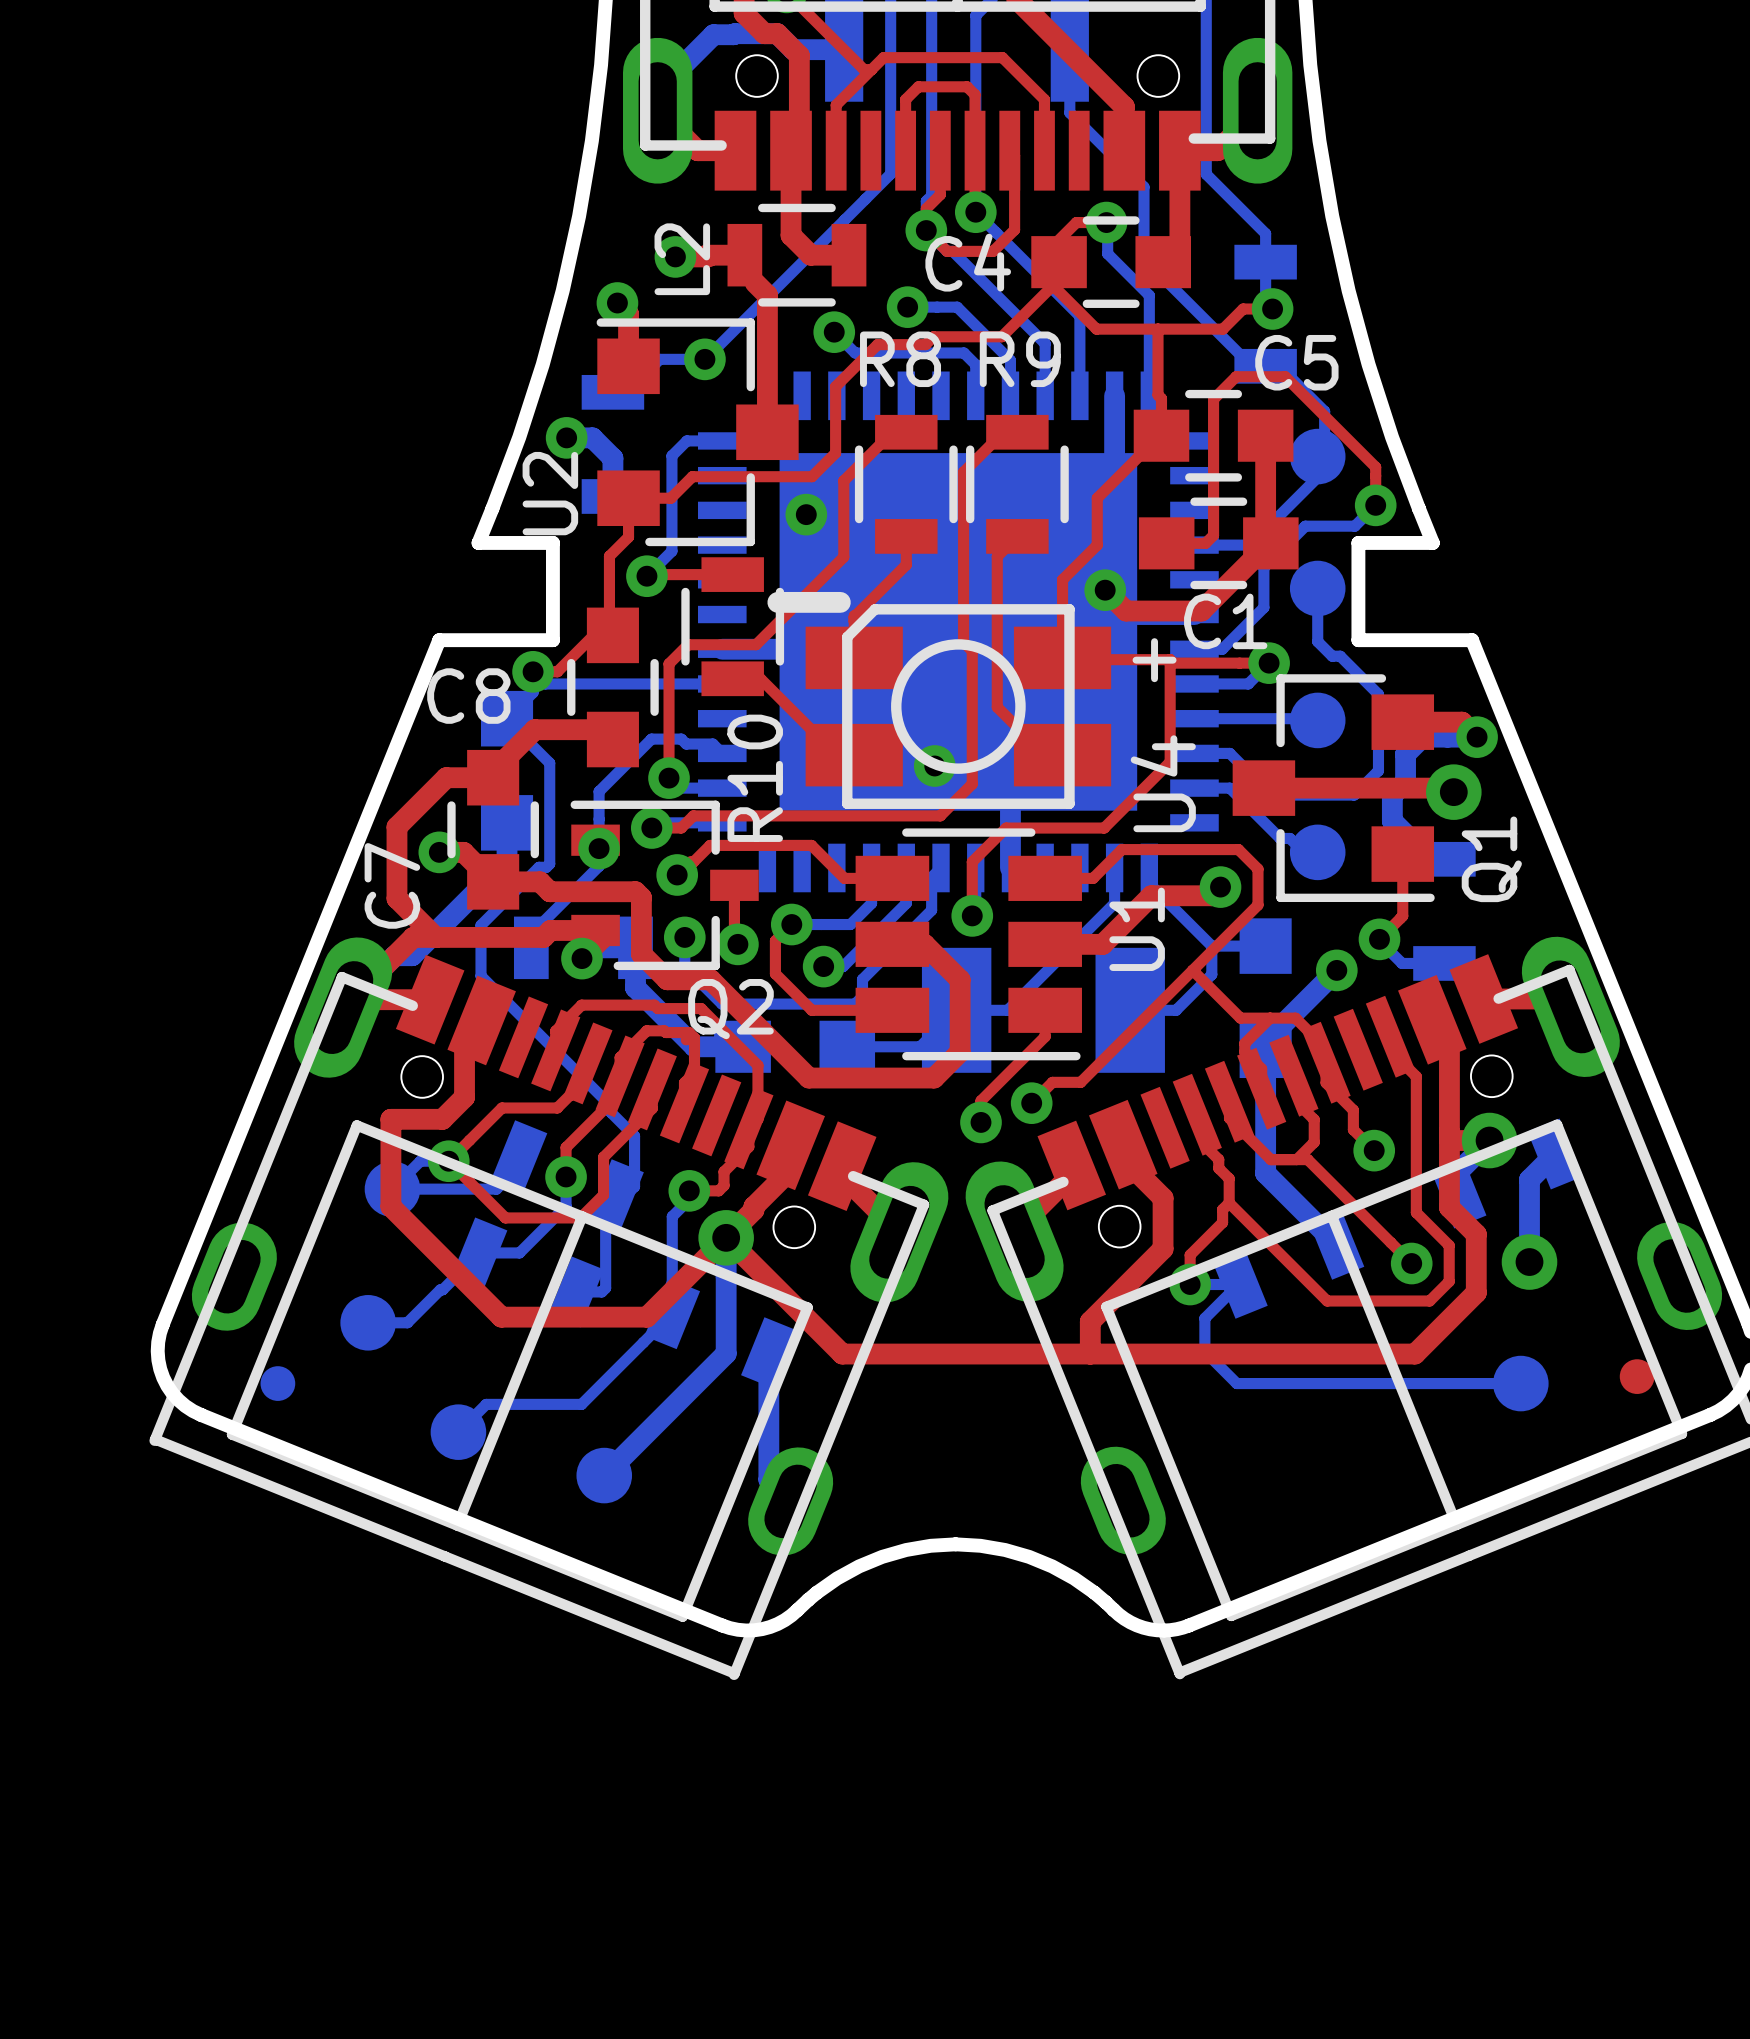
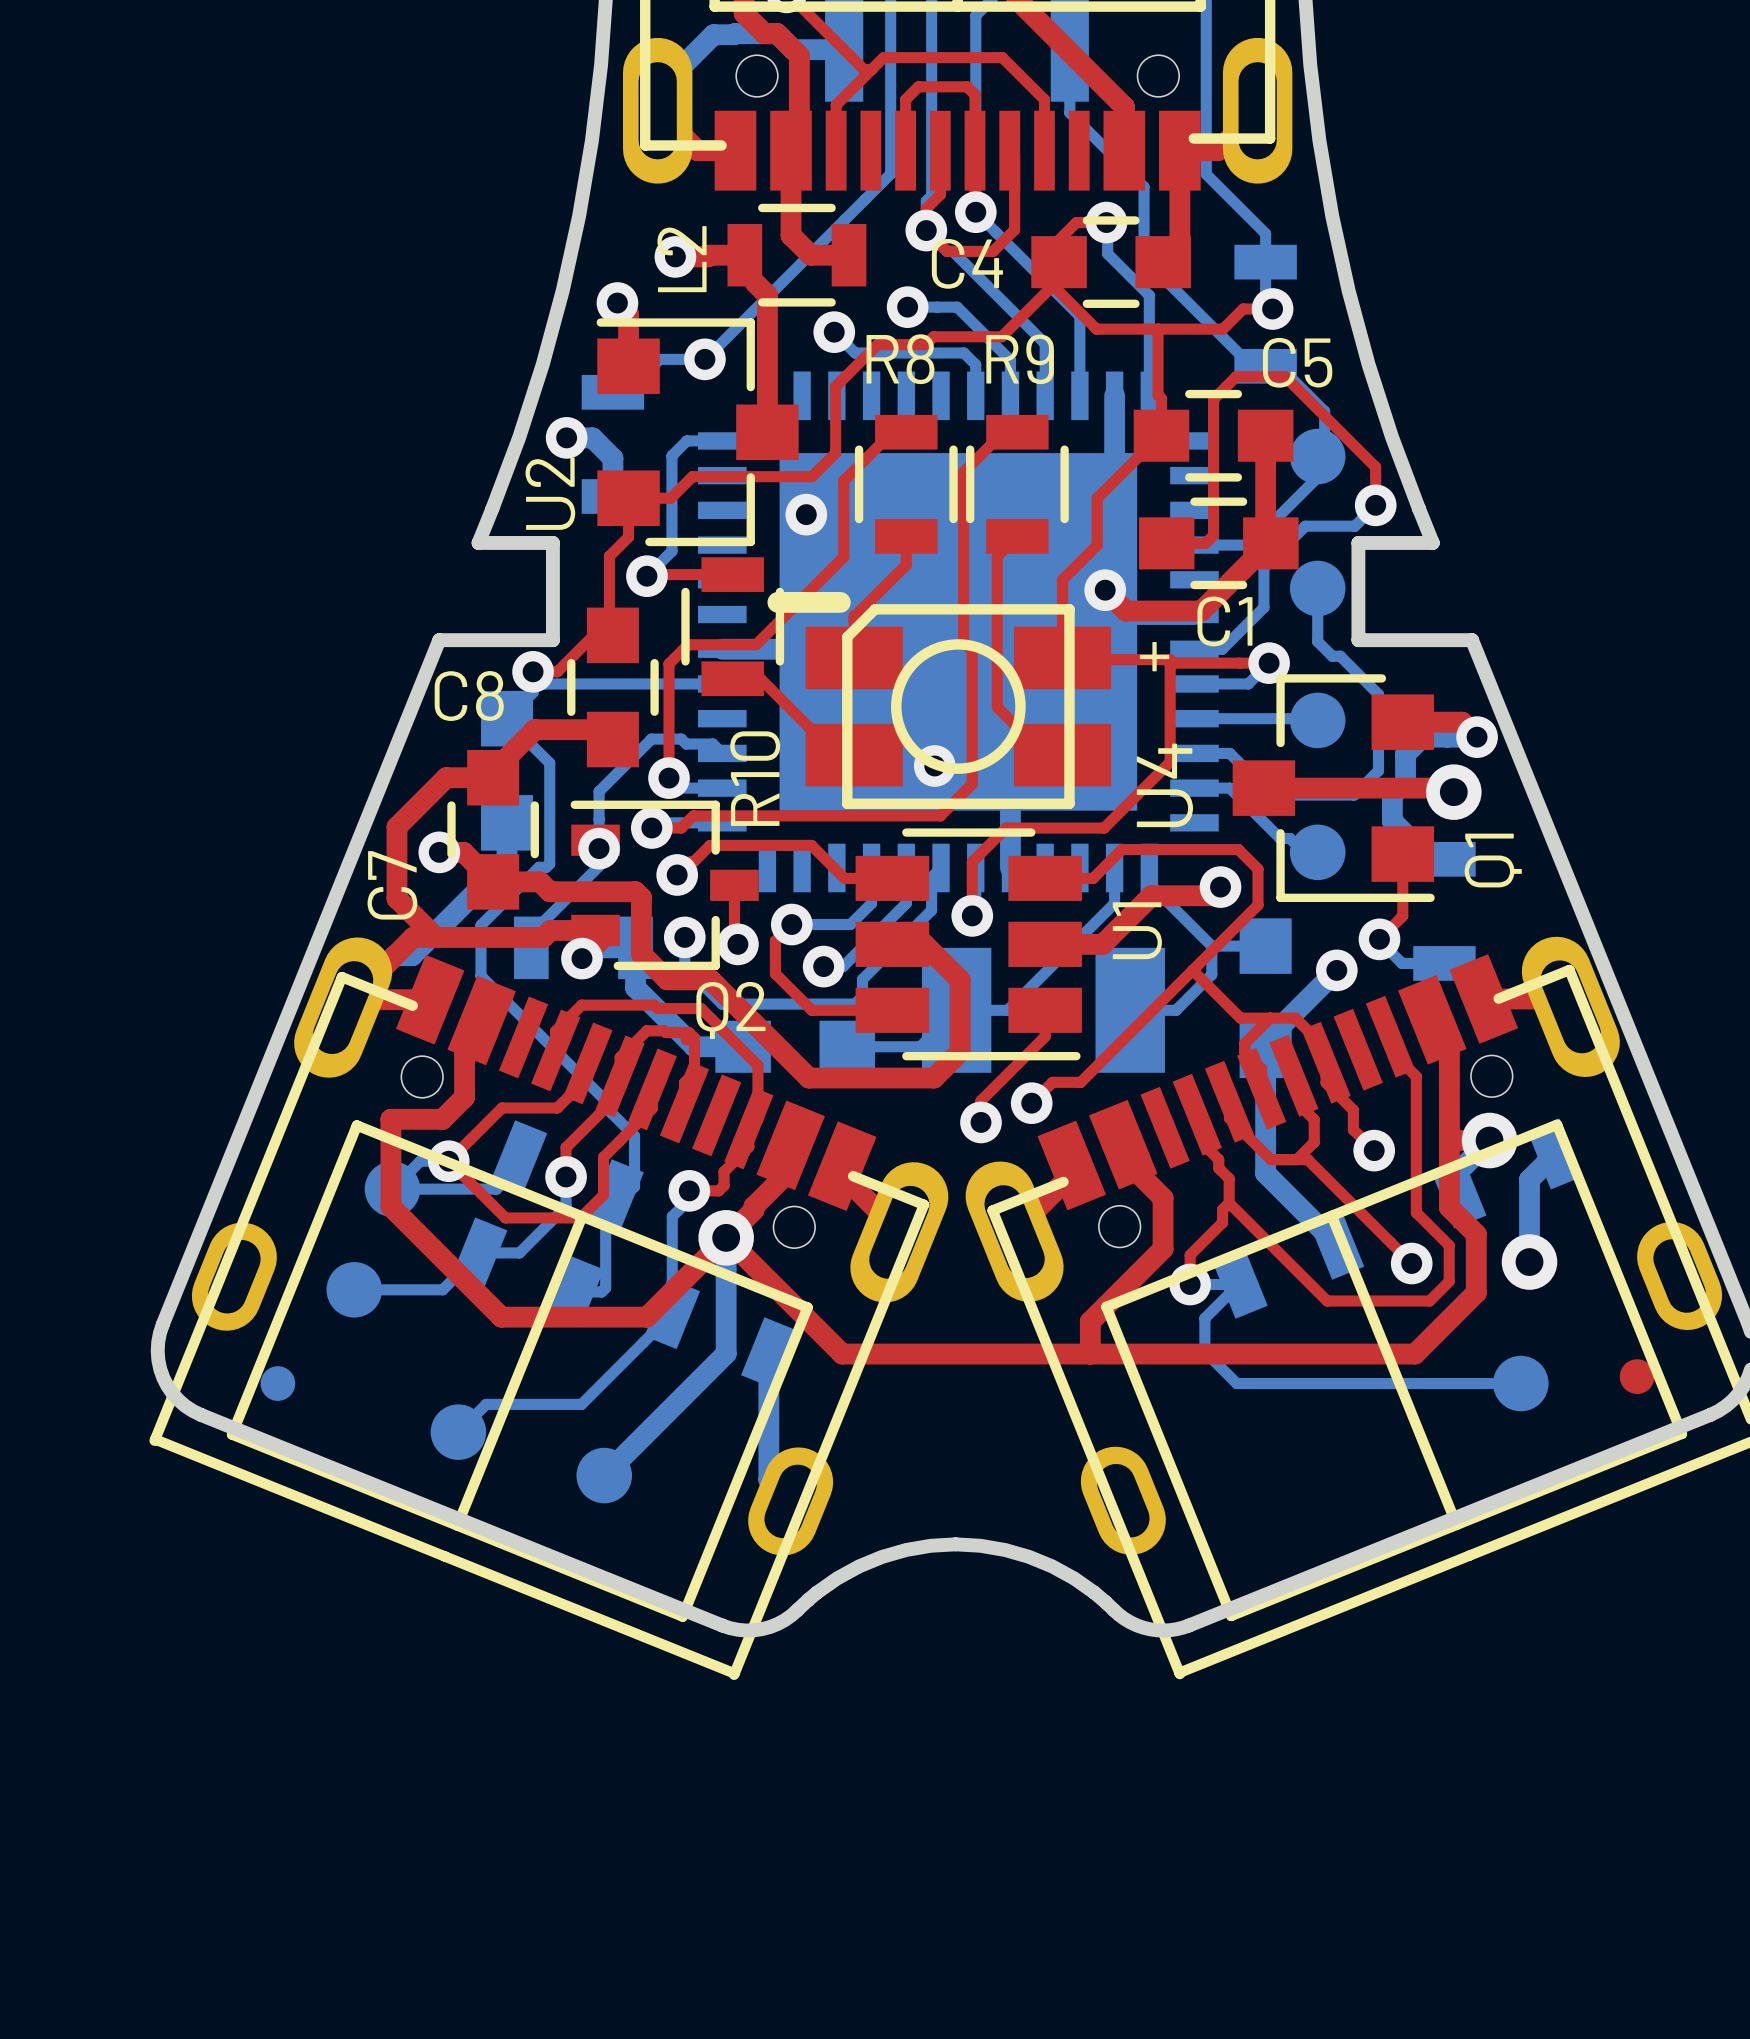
bottom track: (440, 1289) (407, 1322) (368, 1322) -> (440, 1289) (354, 1289)
part position: (368, 1322) -> (354, 1289)

